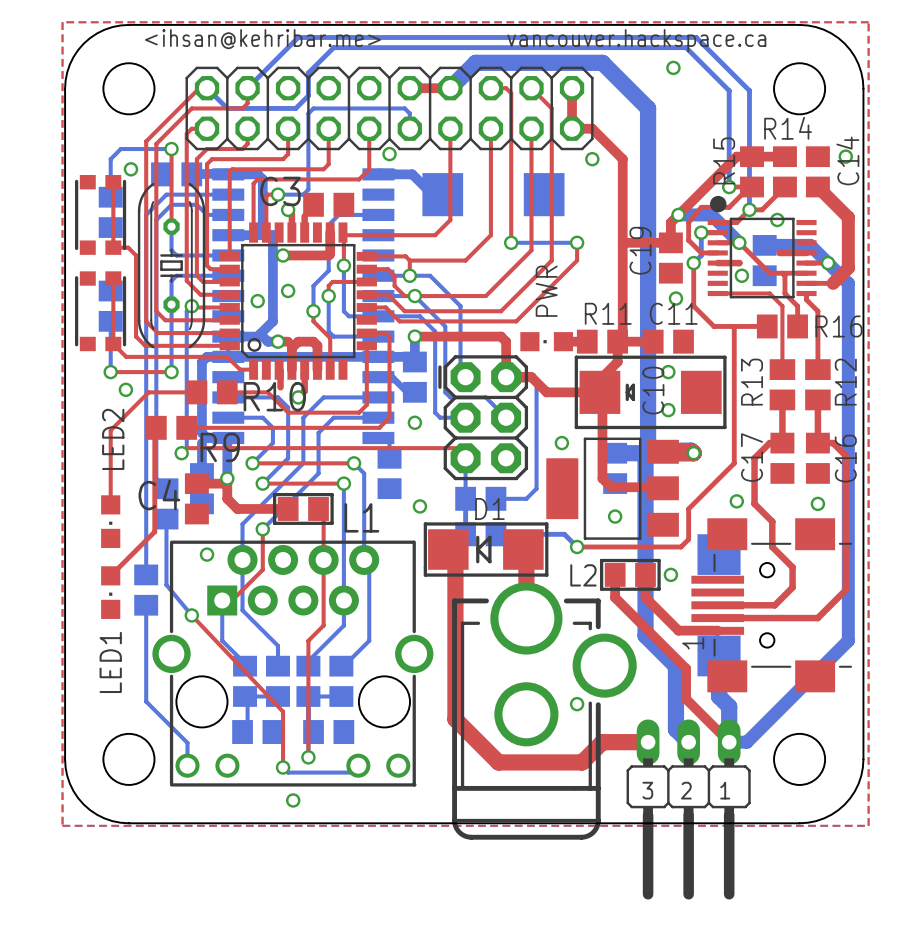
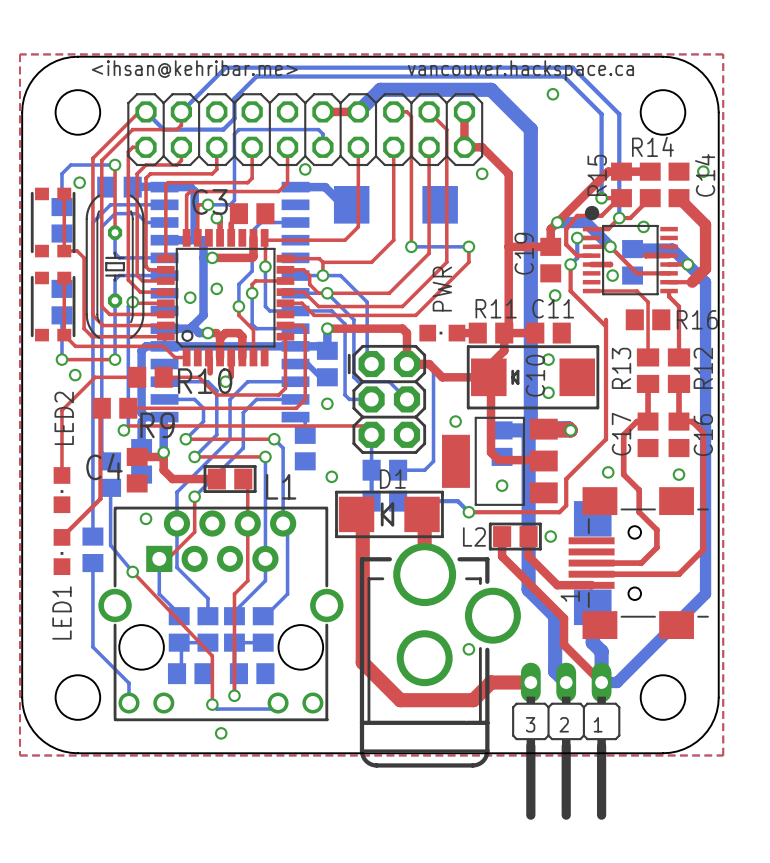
top track: (782, 273) (784, 275) (784, 293) (797, 306) (797, 326) -> none
top track: (693, 293) (693, 306) (713, 326) (767, 326) -> (570, 291) (606, 326)

